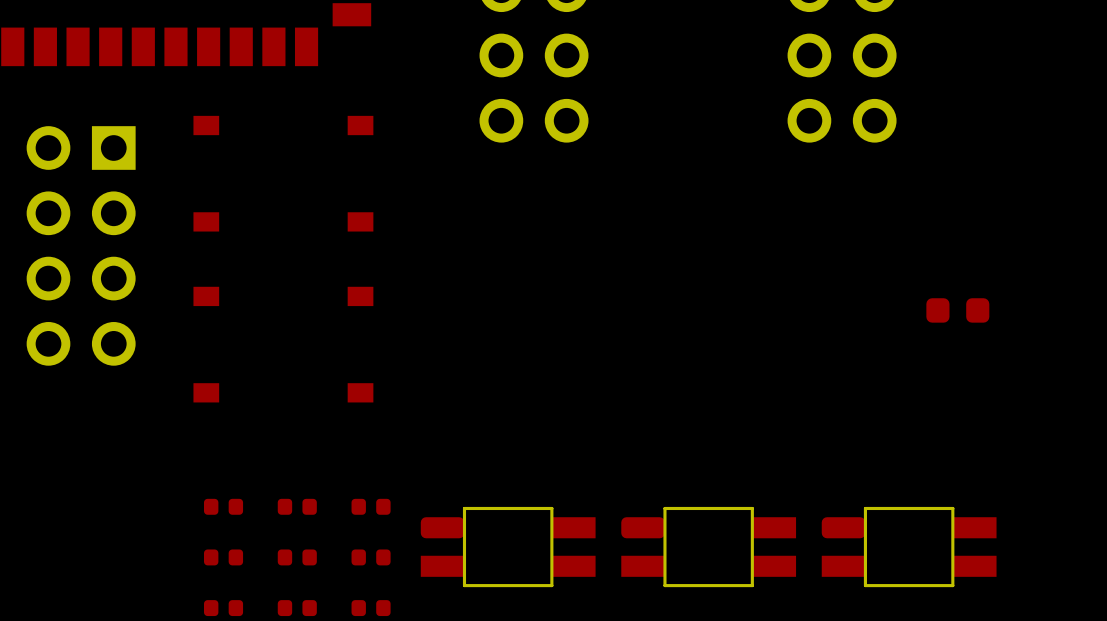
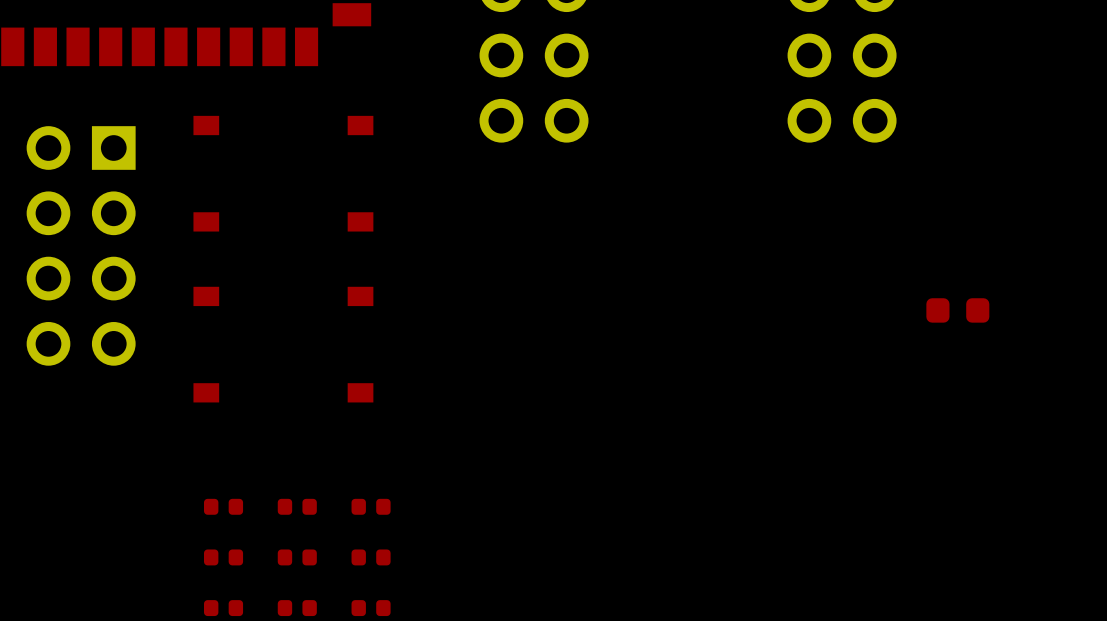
part: (508, 547) -> none
part: (708, 547) -> none
part: (909, 547) -> none

